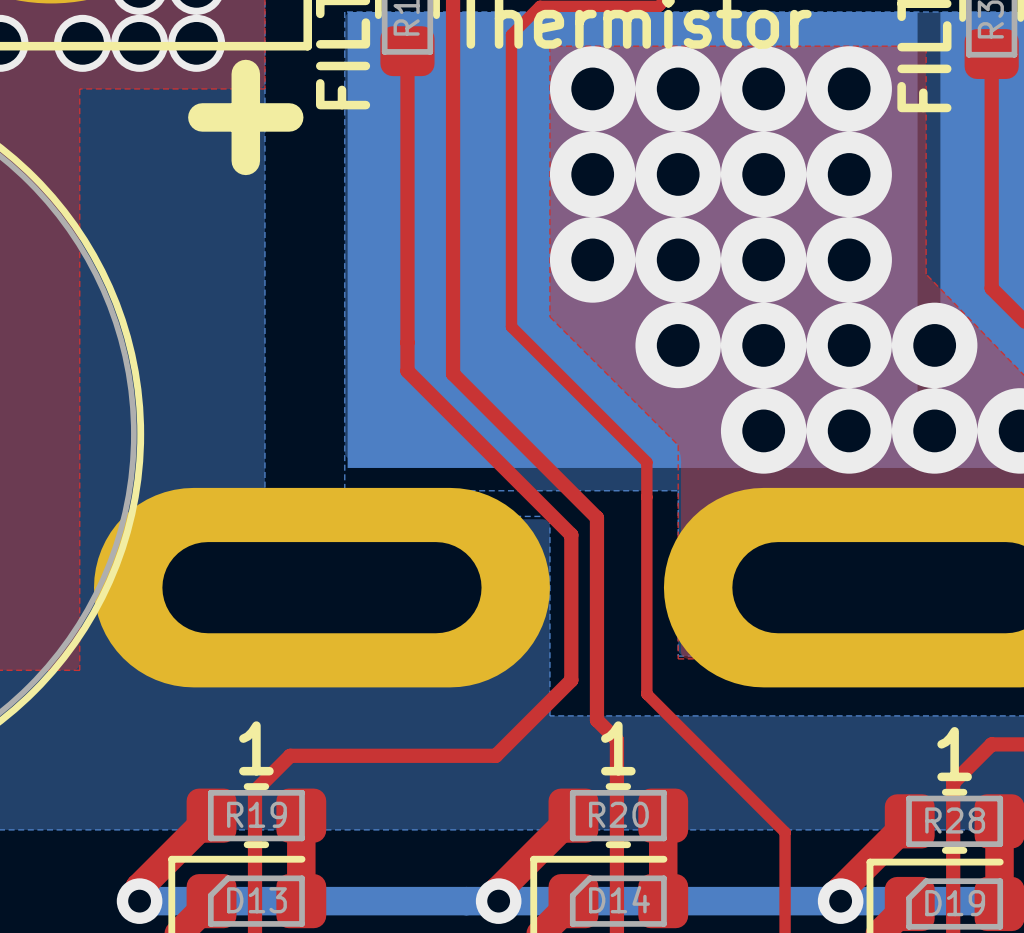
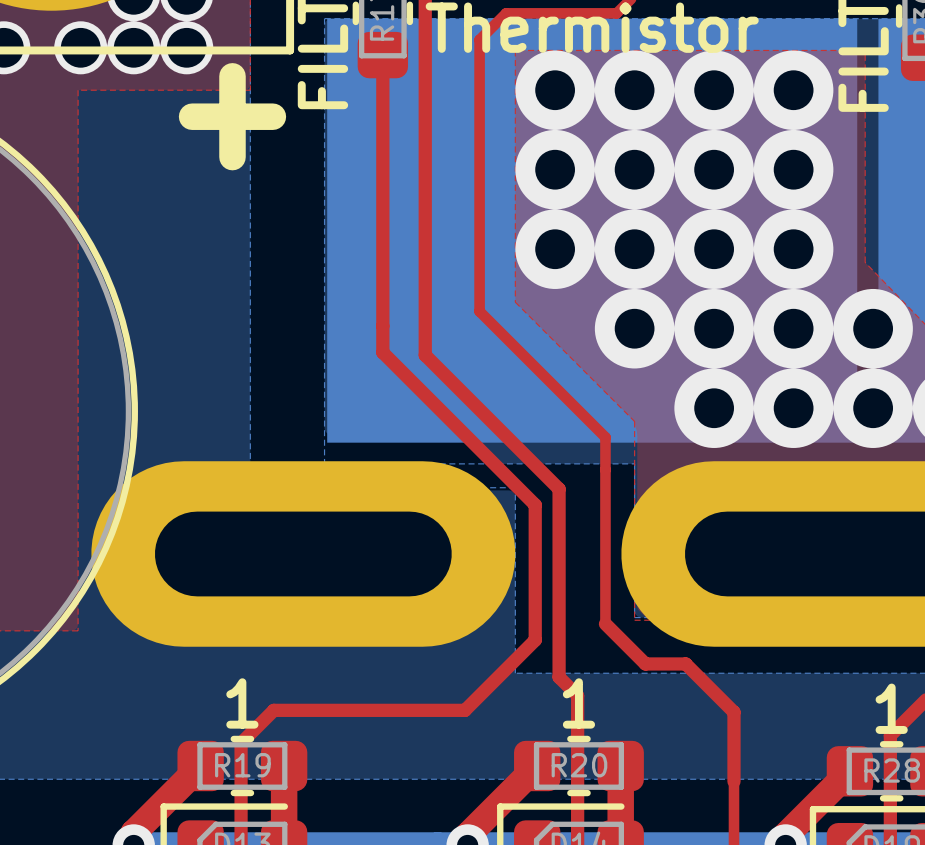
top track: (646, 662) (646, 694) (785, 832) -> (605, 623) (645, 663) (685, 663) (733, 712) (733, 781)

